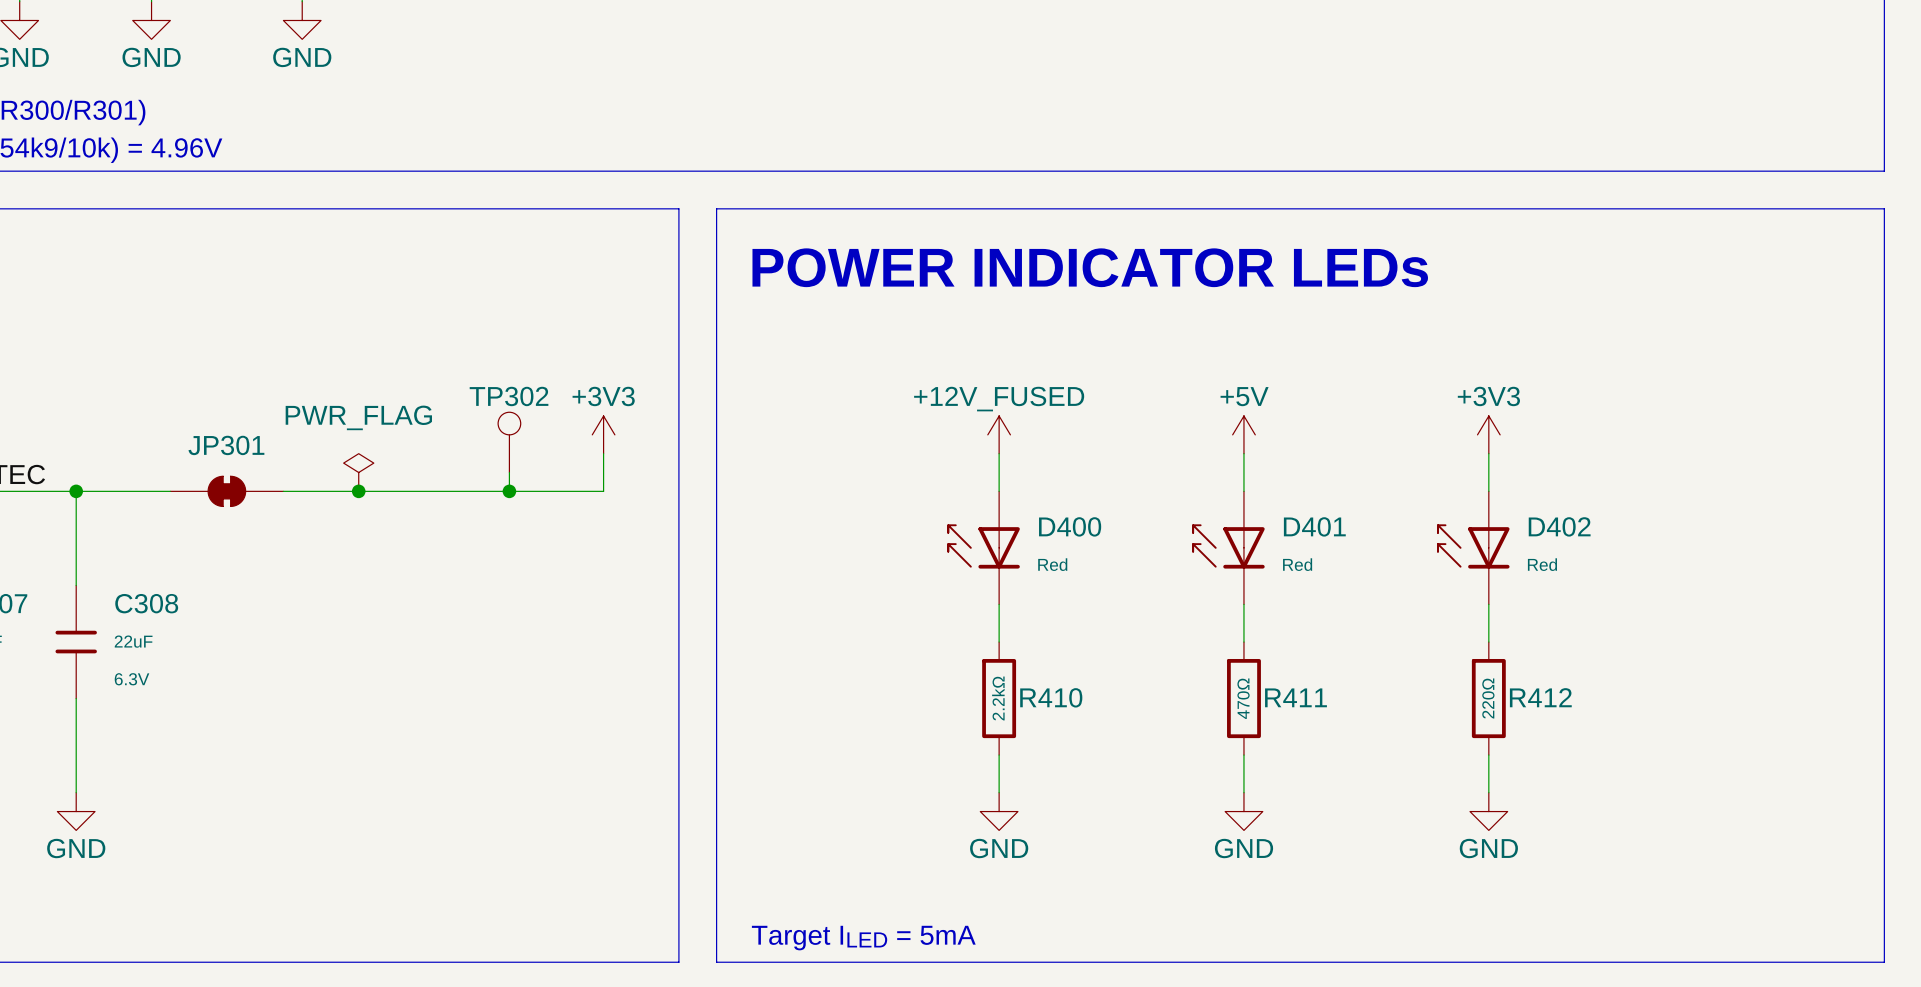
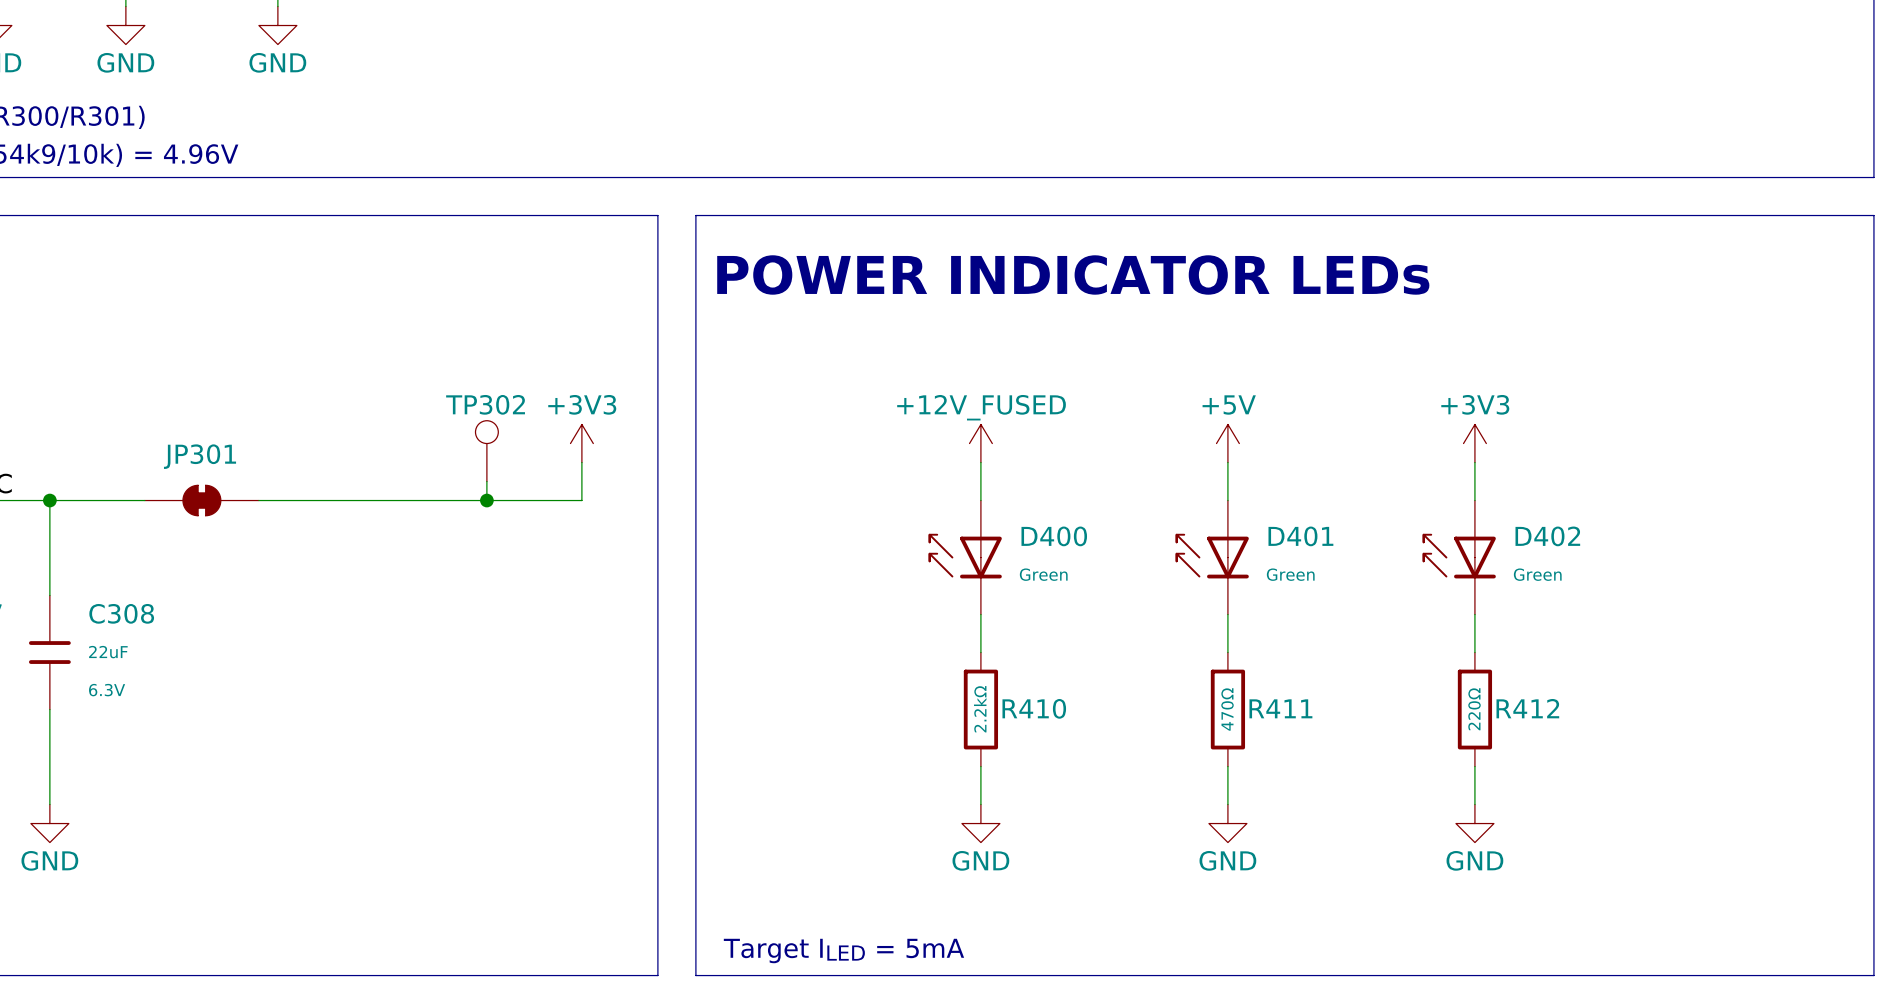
power symbol: PWR_FLAG (358, 472) -> none
junction: (358, 491) -> none
D400 value: Red (1052, 564) -> Green (1043, 574)
D401 value: Red (1297, 564) -> Green (1290, 574)
D402 value: Red (1542, 564) -> Green (1537, 574)

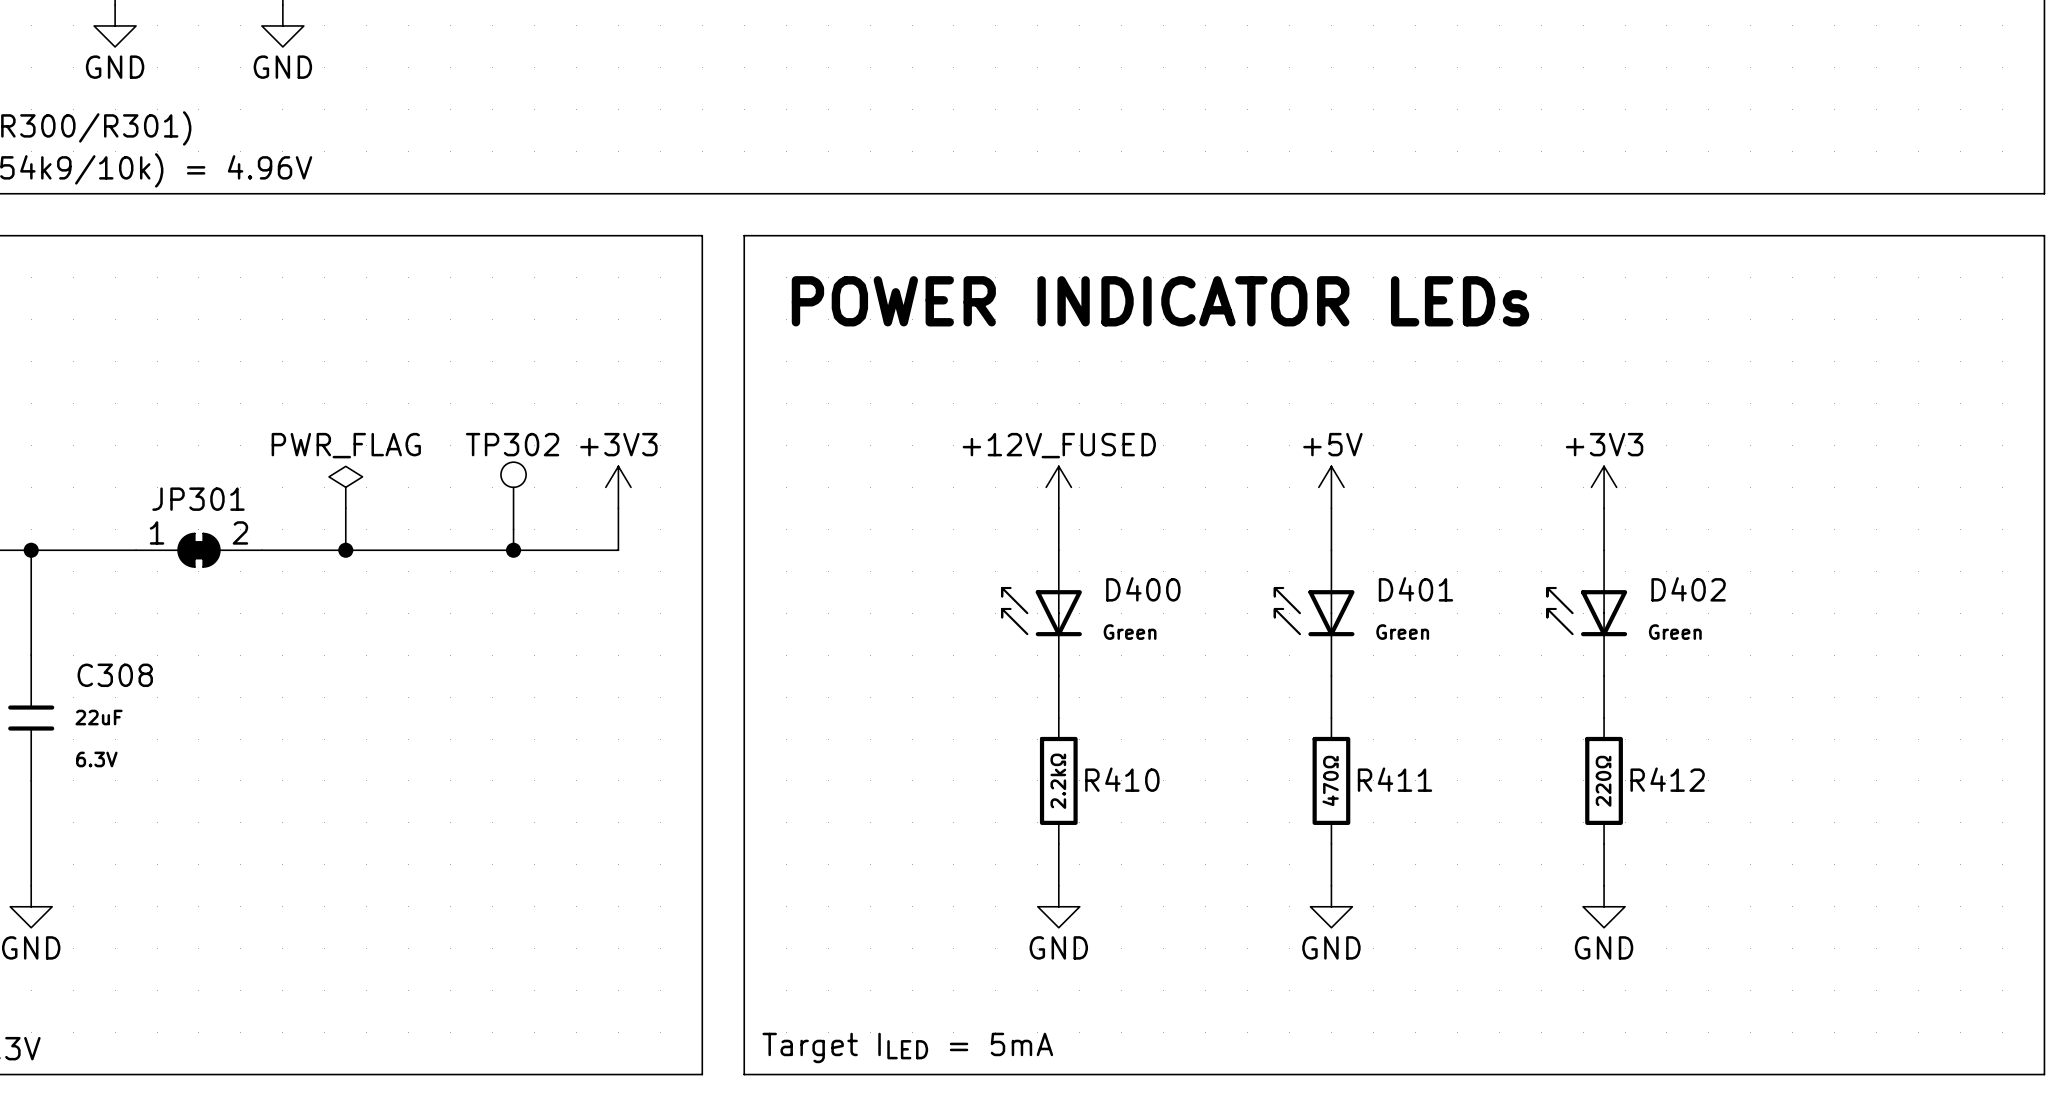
power symbol: none -> PWR_FLAG (345, 487)
wire: none -> (345, 508) (345, 550)
JP301 pin number: none -> 1 (157, 532)
JP301 pin number: none -> 2 (240, 532)
junction: none -> (345, 550)

